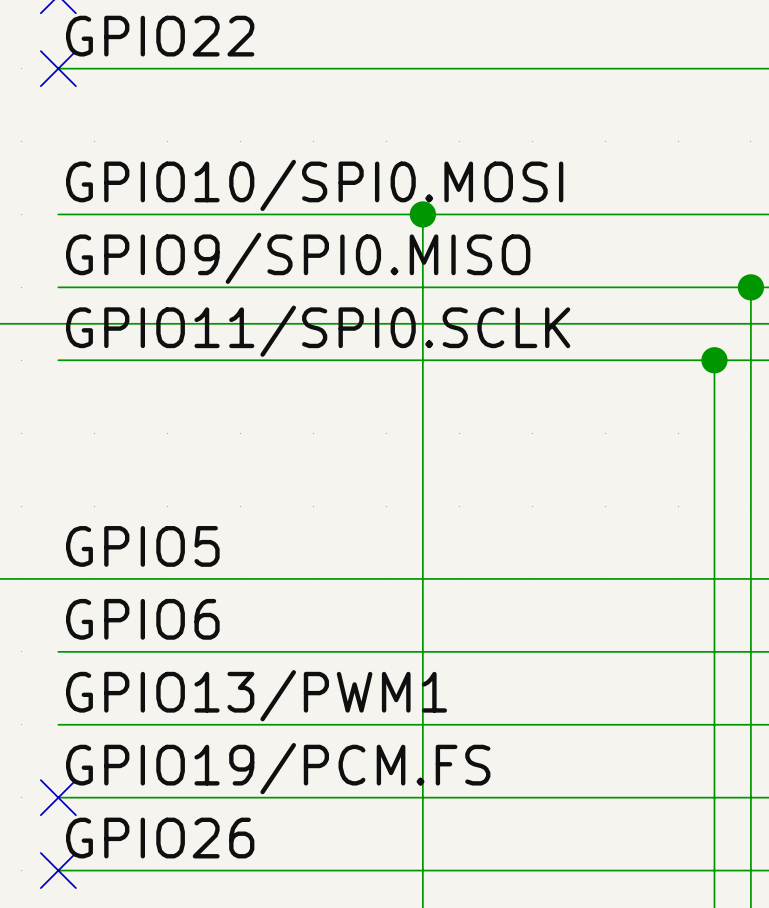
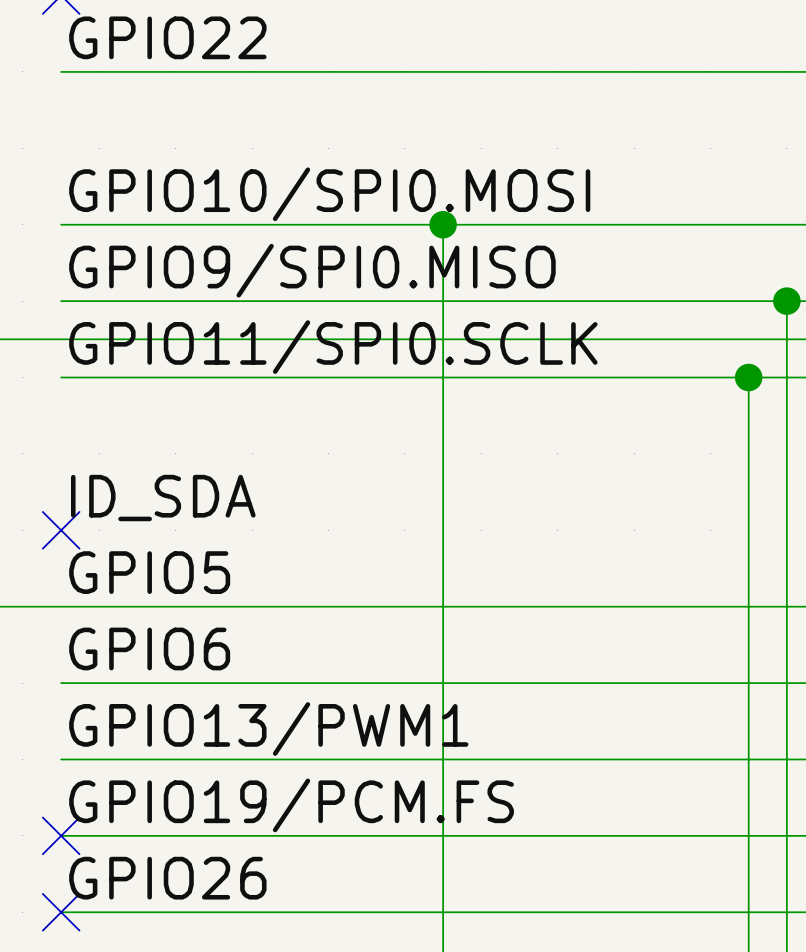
no-connect mark: (58, 68) -> none
label: none -> ID_SDA (163, 498)
no-connect mark: none -> (61, 530)

